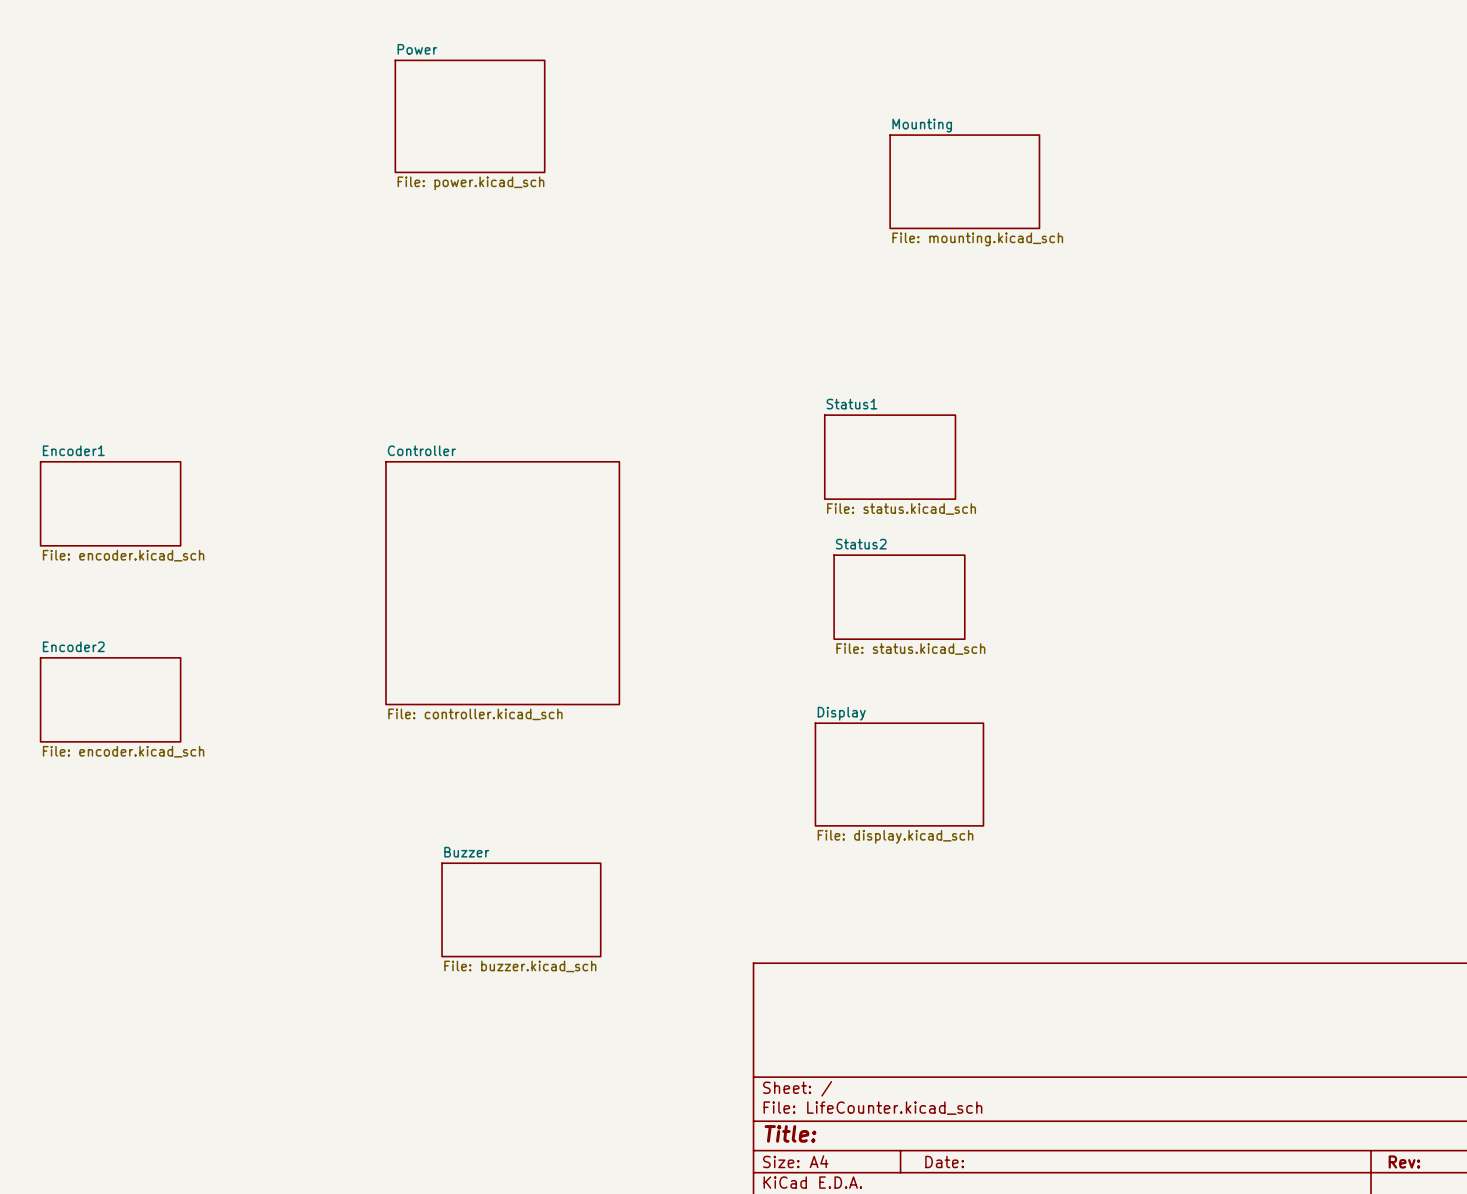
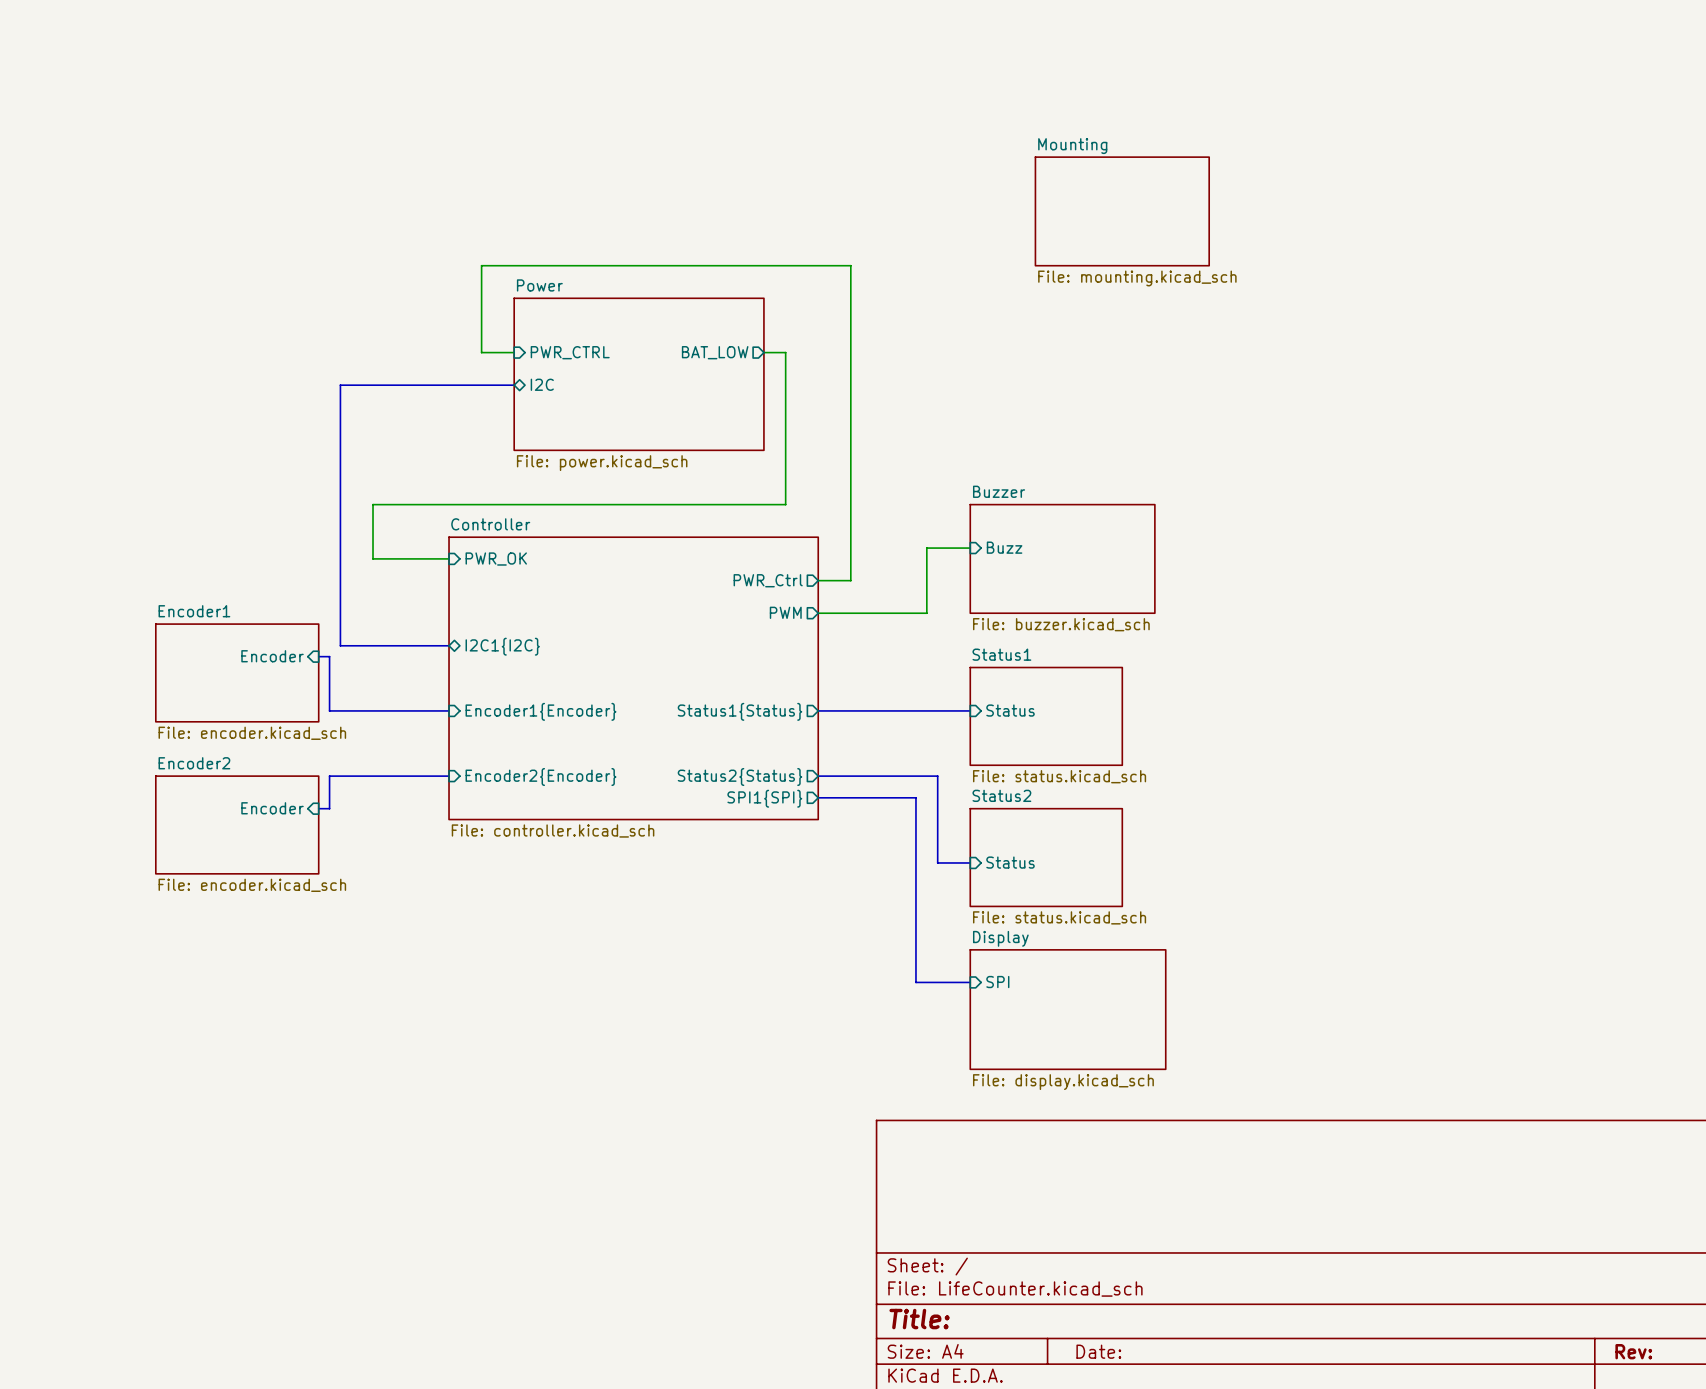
sheet Power: File: power.kicad_sch (470, 116) -> none
wire: none -> (514, 352) (481, 352) (481, 265) (850, 265) (850, 580) (818, 580)
sheet pin: none -> PWR_CTRL (570, 352)
sheet pin: none -> BAT_LOW (715, 352)
wire: none -> (763, 352) (785, 352) (785, 504) (373, 504) (373, 558) (449, 558)
sheet Power: none -> File: power.kicad_sch (639, 374)
sheet pin: none -> I2C (542, 384)
bus: none -> (514, 385) (340, 385) (340, 645) (449, 645)
sheet Status1 position: (890, 457) -> (1046, 716)
sheet pin: none -> Buzz (1004, 547)
wire: none -> (970, 548) (926, 548) (926, 613) (818, 613)
sheet pin: none -> PWR_OK (496, 559)
sheet Buzzer: none -> File: buzzer.kicad_sch (1062, 558)
sheet pin: none -> PWR_Ctrl (768, 580)
sheet Encoder1 position: (110, 503) -> (237, 672)
sheet pin: none -> PWM (785, 612)
sheet pin: none -> I2C1{I2C} (502, 646)
sheet pin: none -> Encoder (272, 656)
bus: none -> (318, 656) (329, 656) (329, 710) (449, 710)
sheet Controller: File: controller.kicad_sch (502, 583) -> none
sheet Controller: none -> File: controller.kicad_sch (633, 678)
sheet Status2 position: (899, 597) -> (1046, 857)
sheet pin: none -> Status (1010, 710)
sheet pin: none -> Encoder1{Encoder} (540, 711)
sheet pin: none -> Status1{Status} (739, 711)
bus: none -> (818, 710) (970, 710)
bus: none -> (449, 776) (329, 776) (329, 808) (318, 808)
sheet pin: none -> Encoder2{Encoder} (540, 777)
sheet pin: none -> Status2{Status} (739, 777)
bus: none -> (818, 776) (937, 776) (937, 862) (970, 862)
bus: none -> (818, 797) (915, 797) (915, 982) (970, 982)
sheet pin: none -> SPI1{SPI} (764, 798)
sheet pin: none -> Encoder (272, 808)
sheet Encoder2 position: (110, 699) -> (237, 824)
sheet pin: none -> Status (1010, 862)
sheet Display position: (899, 774) -> (1068, 1009)
sheet pin: none -> SPI (997, 982)
sheet Buzzer: File: buzzer.kicad_sch (521, 909) -> none

